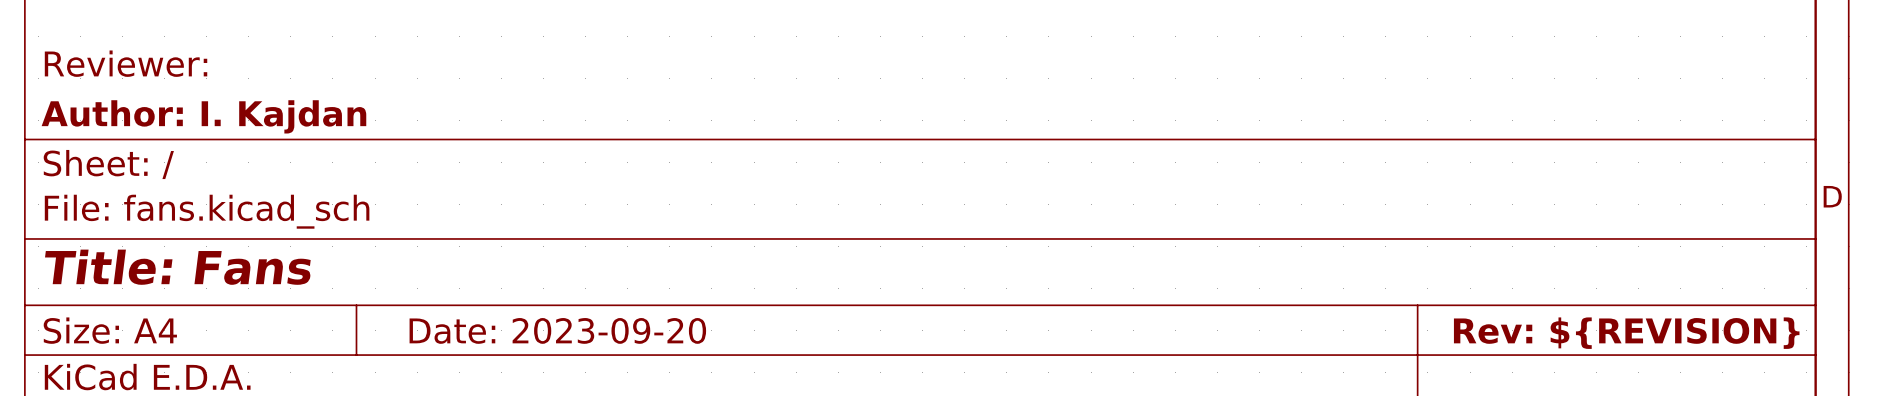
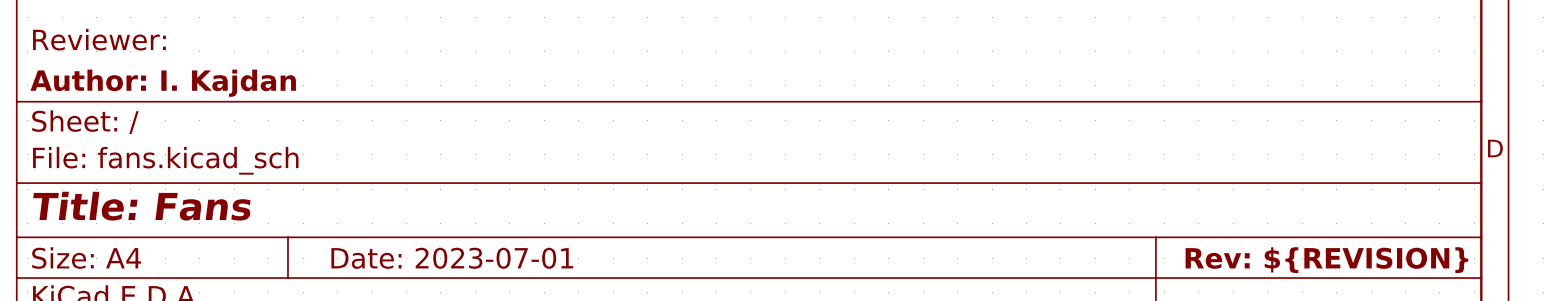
title block: Date: 2023-09-20 (557, 330) -> Date: 2023-07-01 (452, 258)

